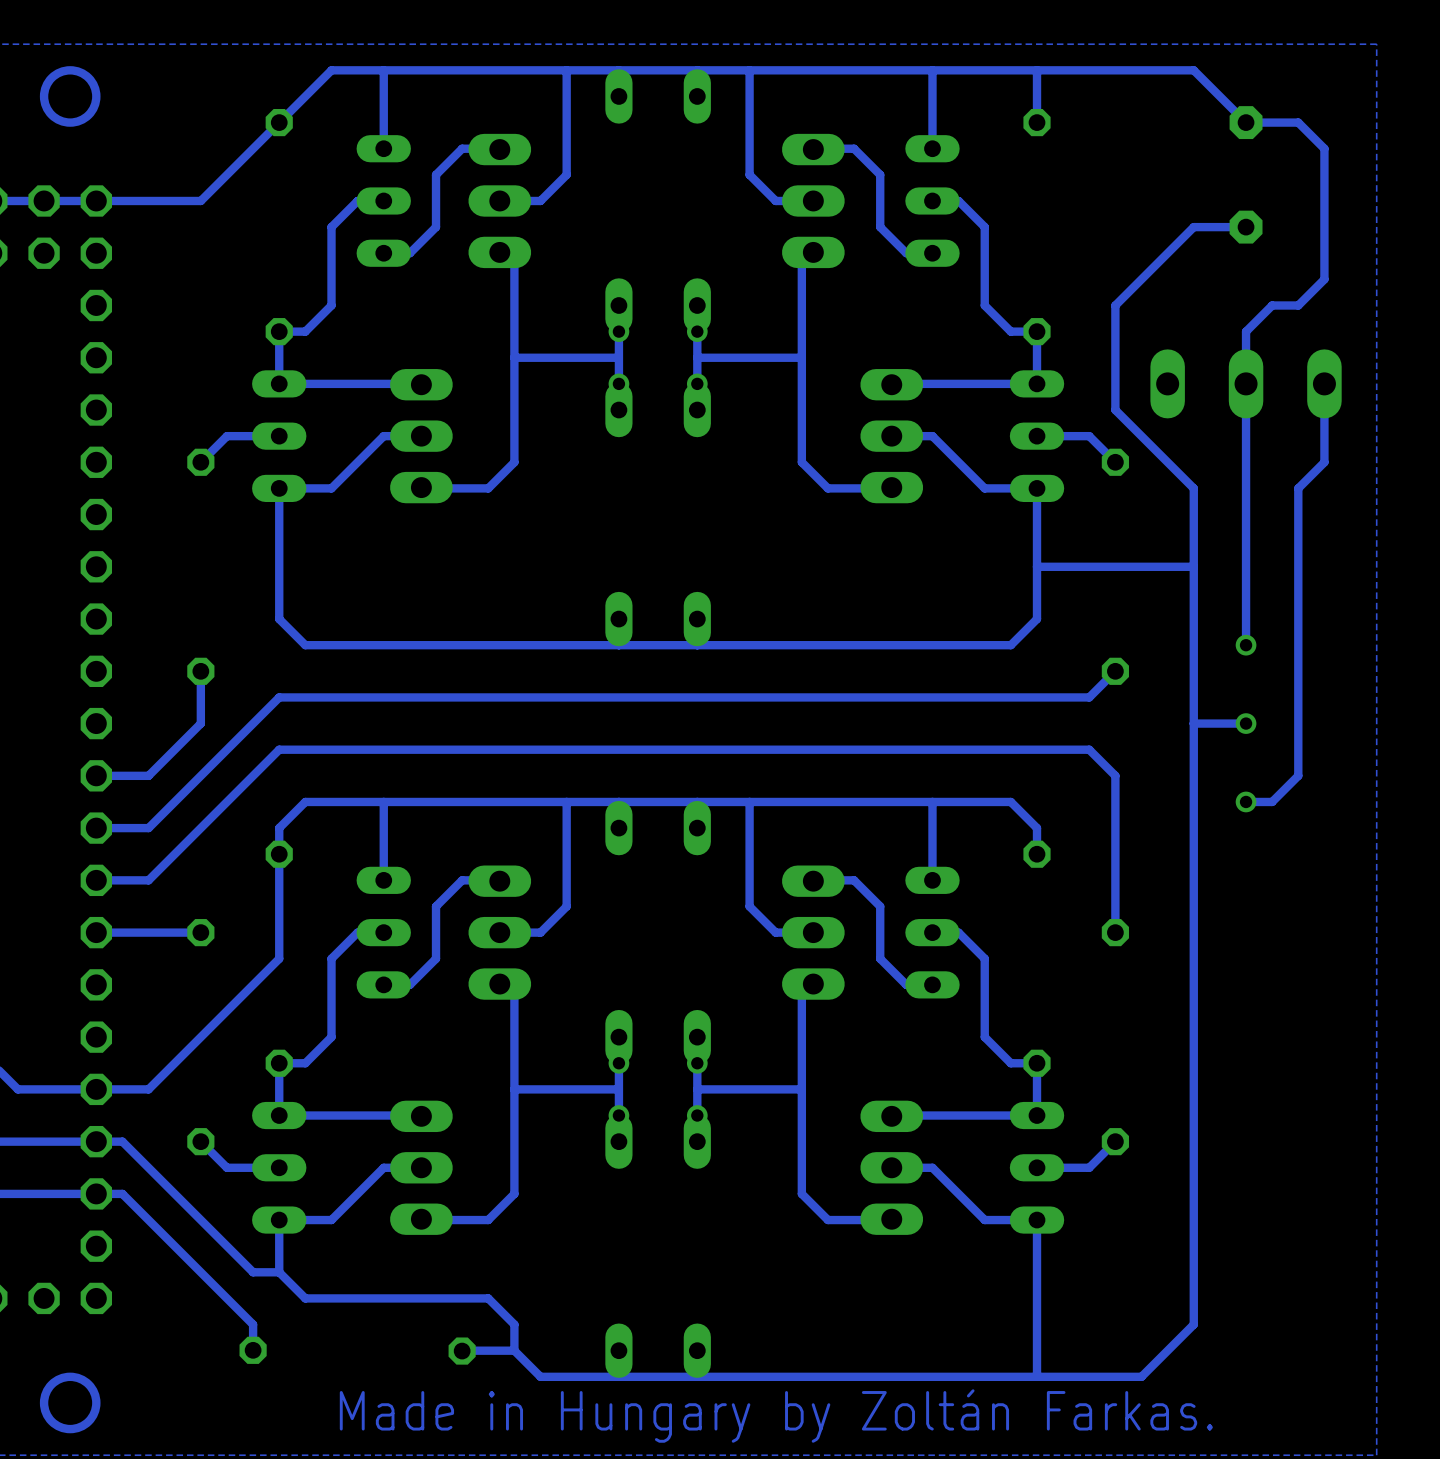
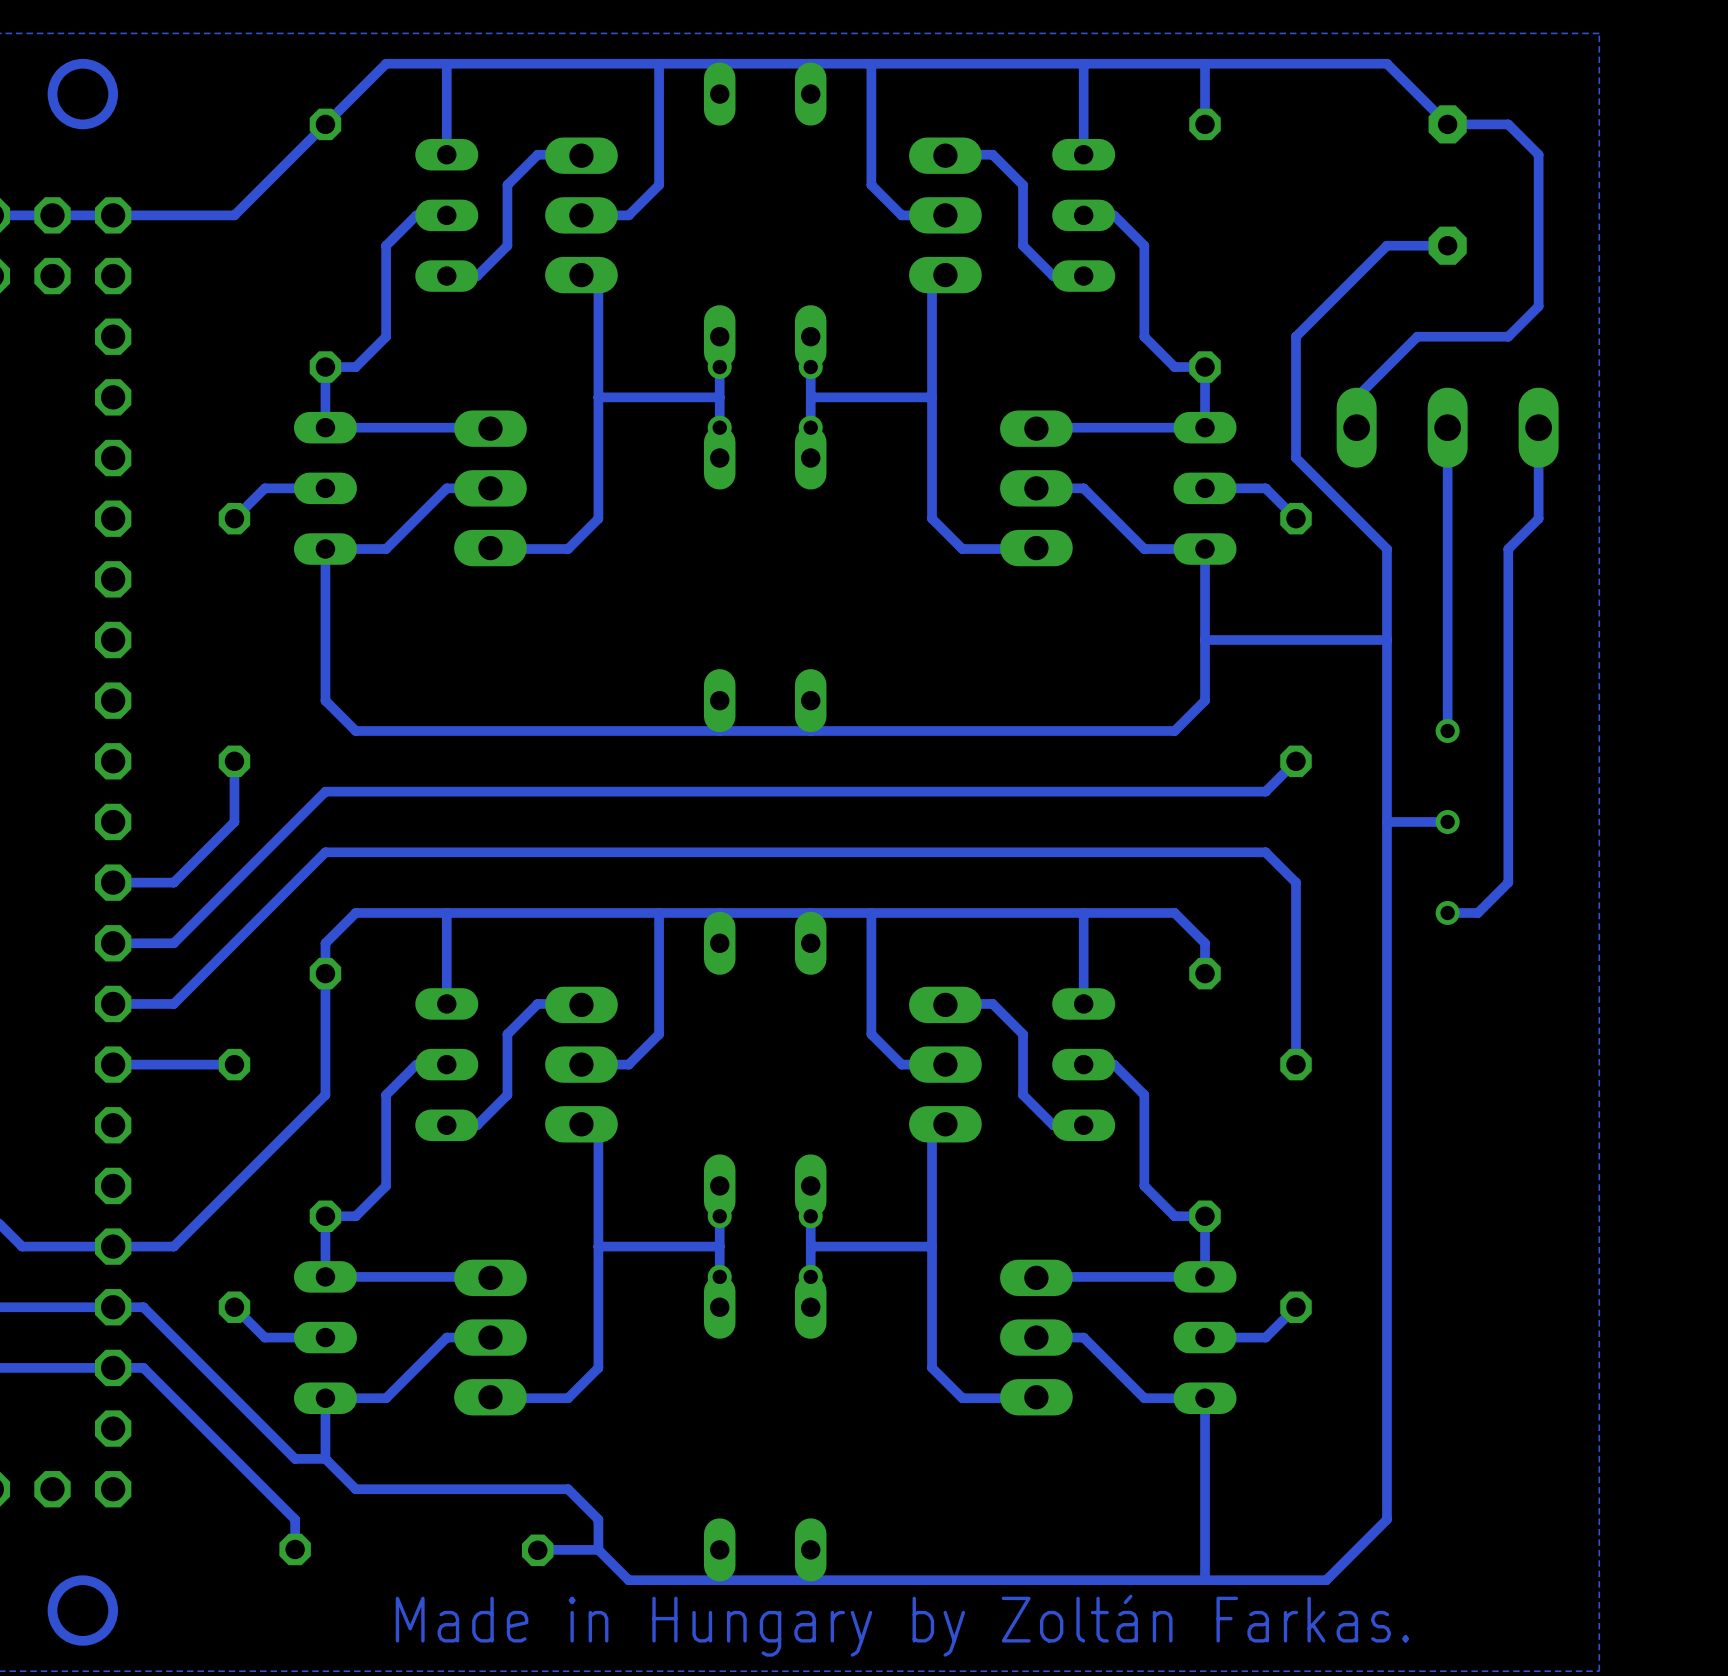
track: (1272, 305) (1246, 331) (1246, 383) -> (1477, 336) (1417, 336) (1356, 397) (1356, 427)

